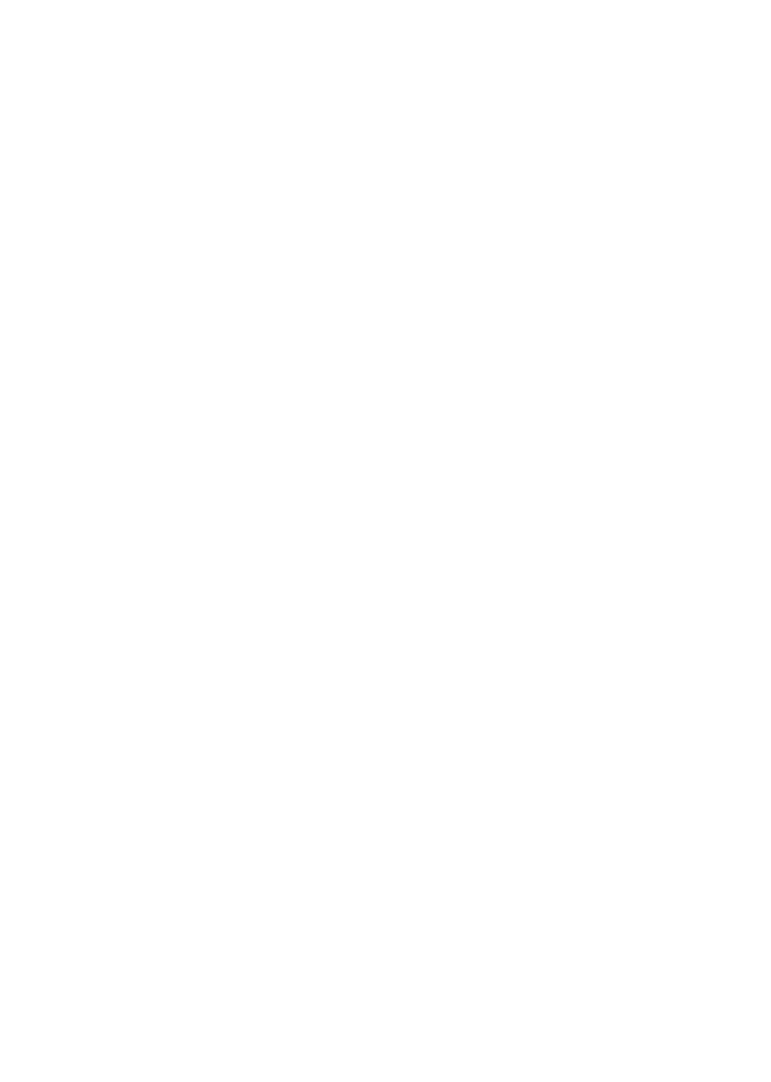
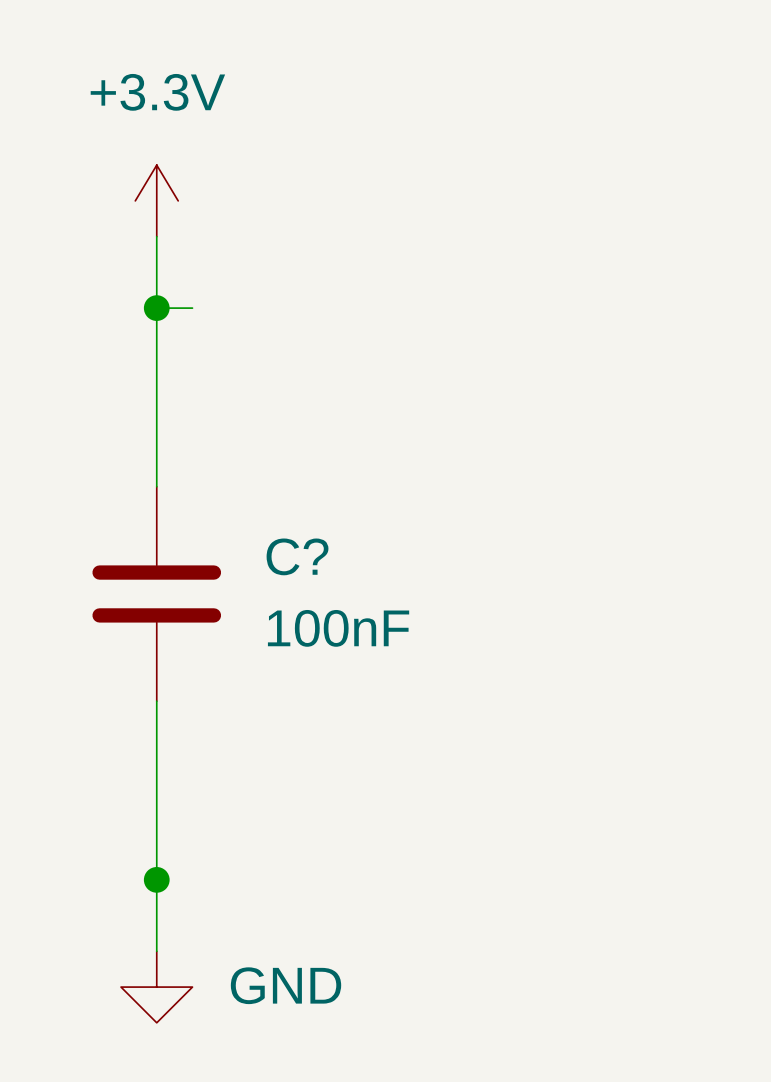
power symbol: none -> +3.3V (156, 200)
wire: none -> (156, 236) (156, 486)
wire: none -> (156, 308) (192, 308)
junction: none -> (156, 308)
C?: none -> 100nF (156, 593)
wire: none -> (156, 701) (156, 951)
junction: none -> (156, 879)
power symbol: none -> GND (156, 987)

